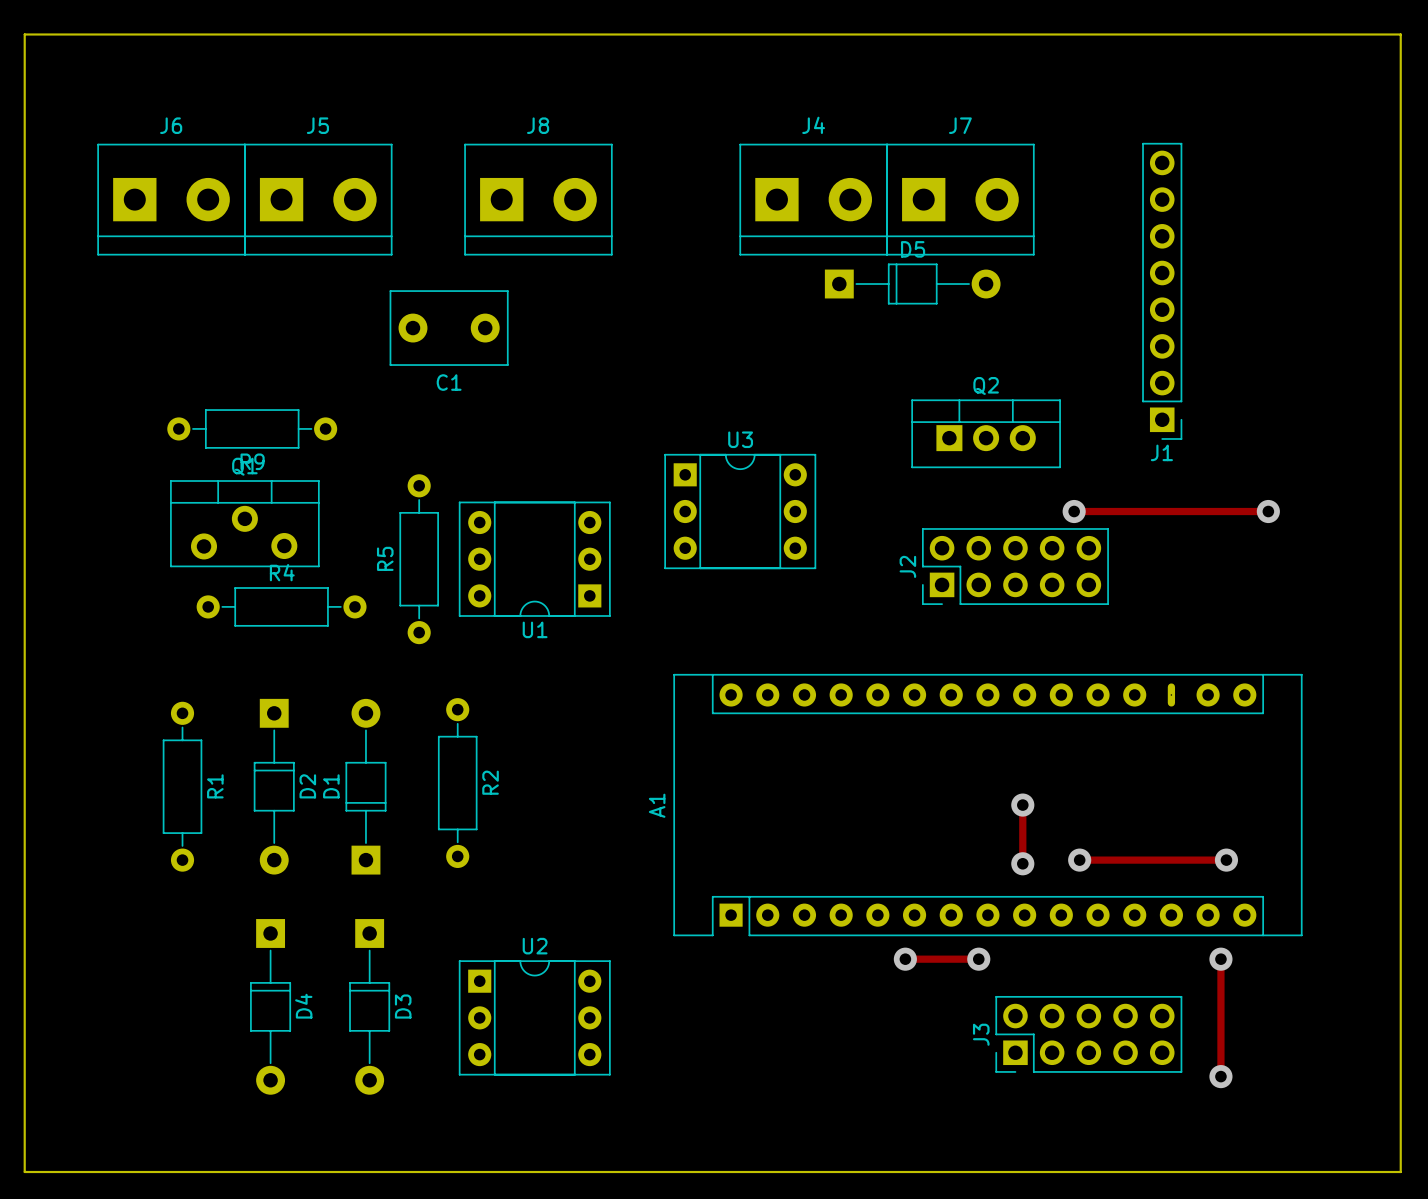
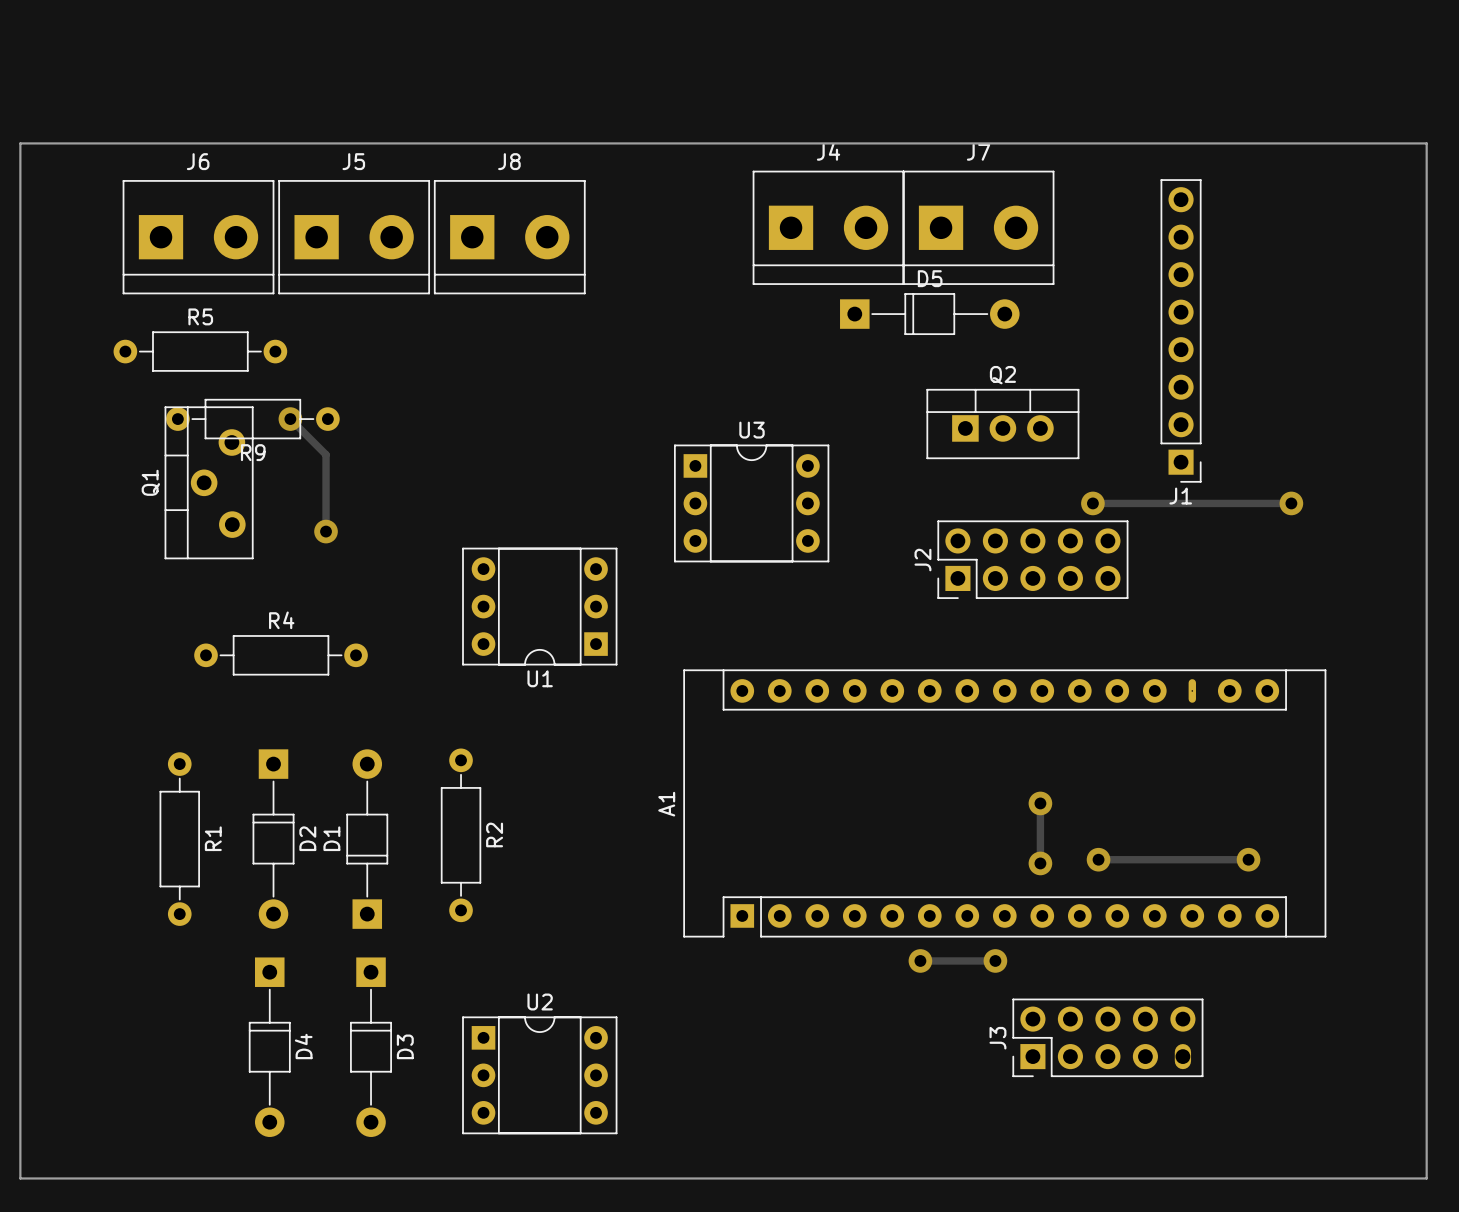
board edge: (24, 159) (24, 34) (1400, 34) (1400, 159) -> (20, 143) (1426, 143)
J6 position: (171, 199) -> (198, 237)
J5 position: (318, 199) -> (354, 237)
J8 position: (538, 199) -> (509, 237)
J4 position: (813, 199) -> (828, 227)
J7 position: (960, 199) -> (978, 227)
D5 position: (912, 284) -> (929, 314)
J1 position: (1162, 291) -> (1181, 330)
C1: (449, 328) -> none
track: none -> (290, 419) (326, 454) (326, 531)
via: none -> (290, 419)
Q1 rotation: 0° (244, 523) -> 90° counterclockwise (209, 482)
via: none -> (326, 531)
R5 rotation: 0° (419, 559) -> 90° clockwise (200, 351)
R5 position: (419, 559) -> (200, 351)
U1 position: (534, 559) -> (539, 606)
R4 position: (281, 606) -> (281, 655)
R2 position: (457, 783) -> (461, 835)
R1 position: (182, 786) -> (179, 839)
D2 position: (274, 786) -> (273, 839)
D1 position: (365, 786) -> (367, 839)
track: (1220, 959) (1220, 1076) -> none
via: (1220, 959) -> none
J3 footprint: [995, 995, 1183, 1073] -> [1012, 998, 1204, 1078]
D4 position: (270, 1006) -> (269, 1047)
D3 position: (369, 1006) -> (371, 1047)
U2 position: (534, 1017) -> (539, 1075)
via: (1220, 1076) -> none

